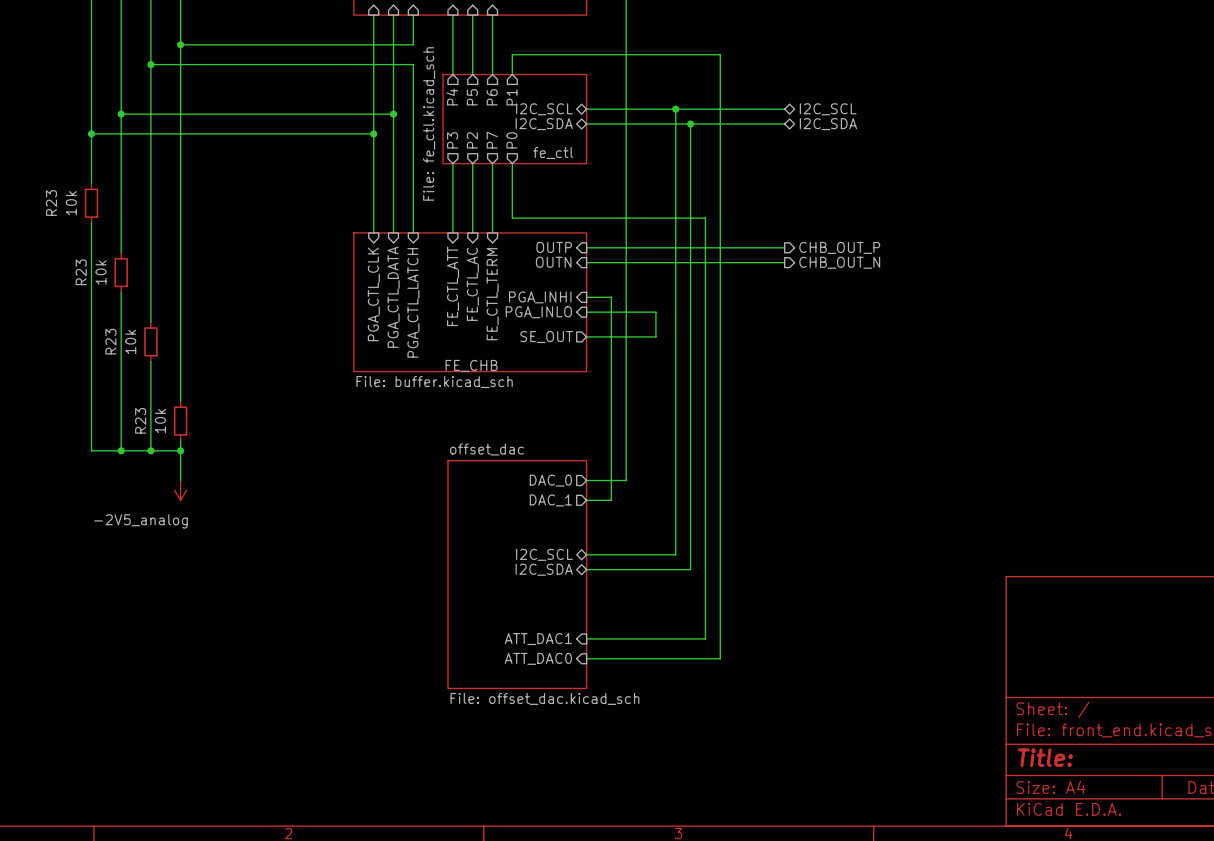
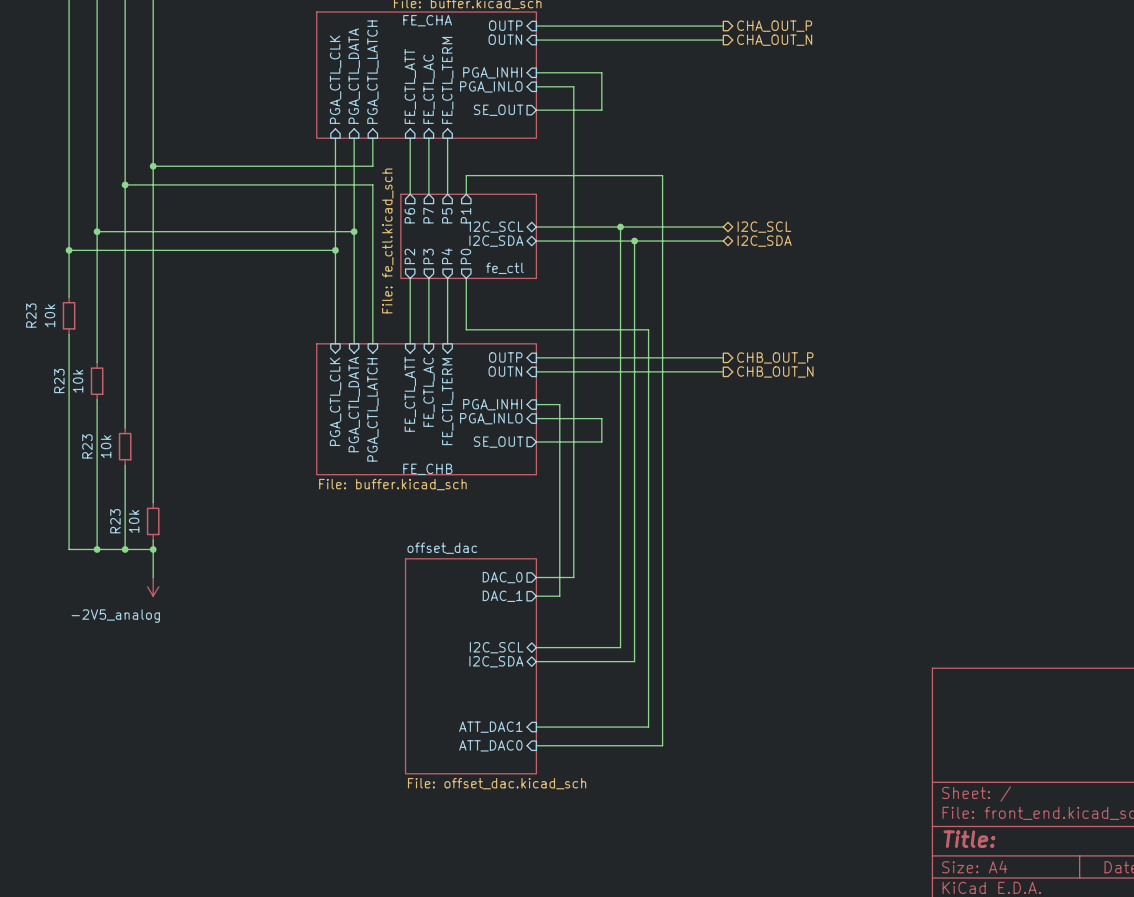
sheet pin: P4 (452, 97) -> P6 (409, 215)
sheet pin: P5 (472, 97) -> P7 (428, 215)
sheet pin: P6 (492, 97) -> P5 (447, 215)
sheet pin: P3 (452, 140) -> P2 (409, 256)
sheet pin: P2 (472, 140) -> P3 (428, 256)
sheet pin: P7 (492, 140) -> P4 (447, 256)

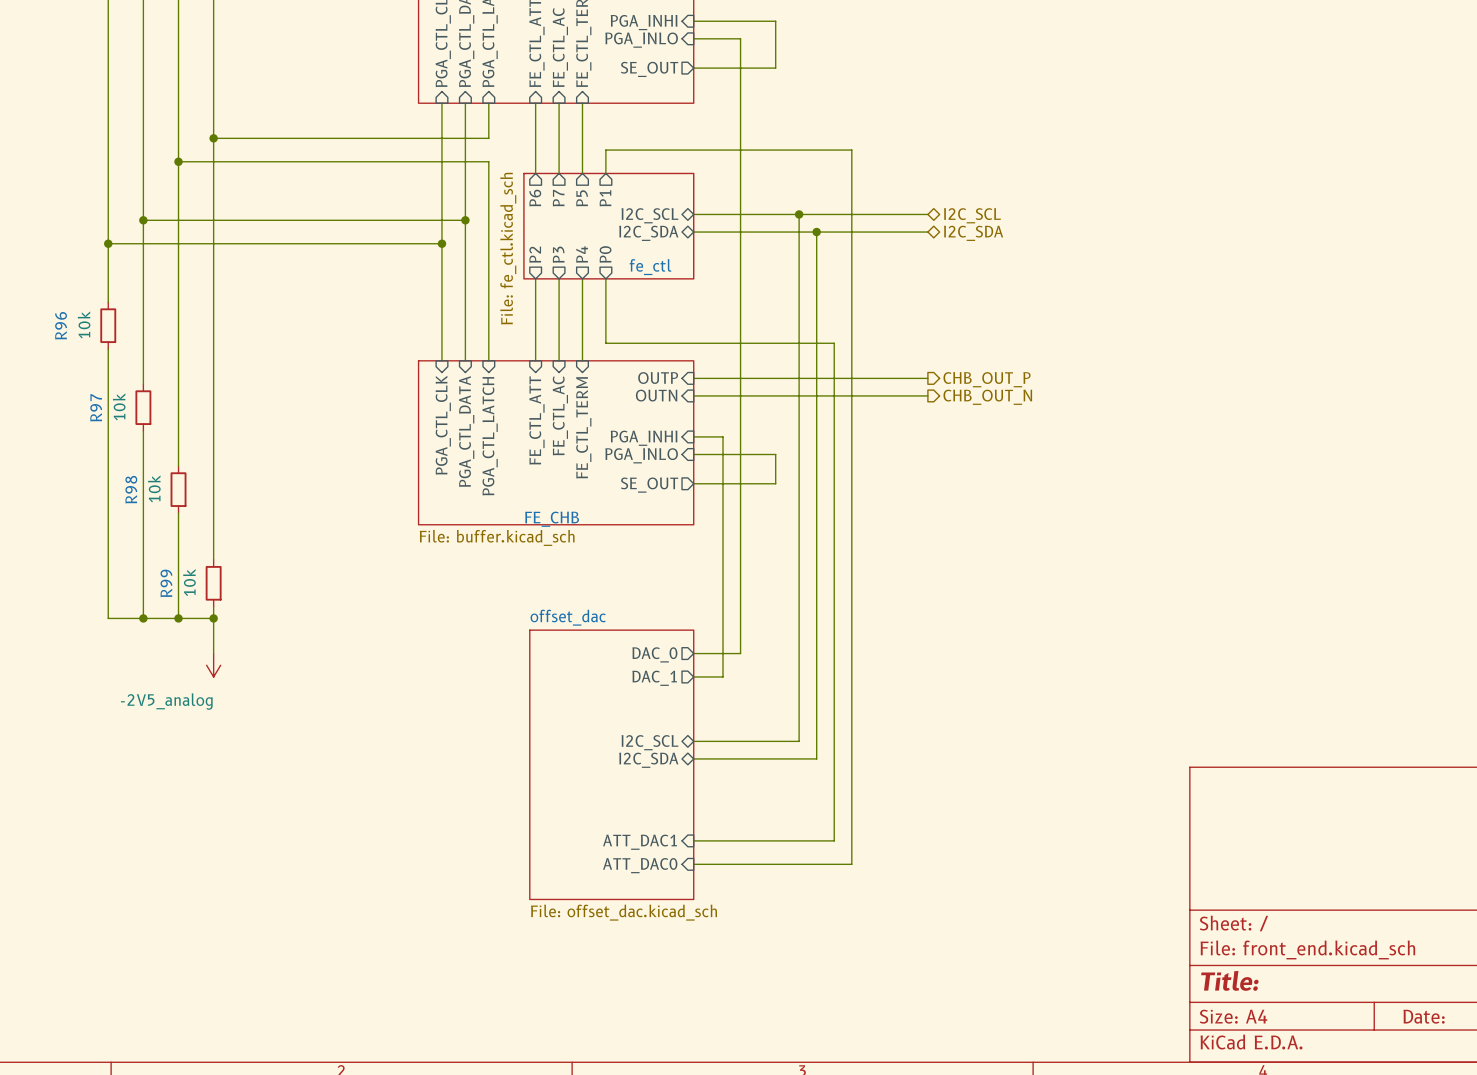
R23 name: R23 (31, 315) -> R96 (61, 325)
R23 name: R23 (59, 381) -> R97 (96, 407)
R23 name: R23 (87, 446) -> R98 (131, 489)
R23 name: R23 (115, 521) -> R99 (166, 583)

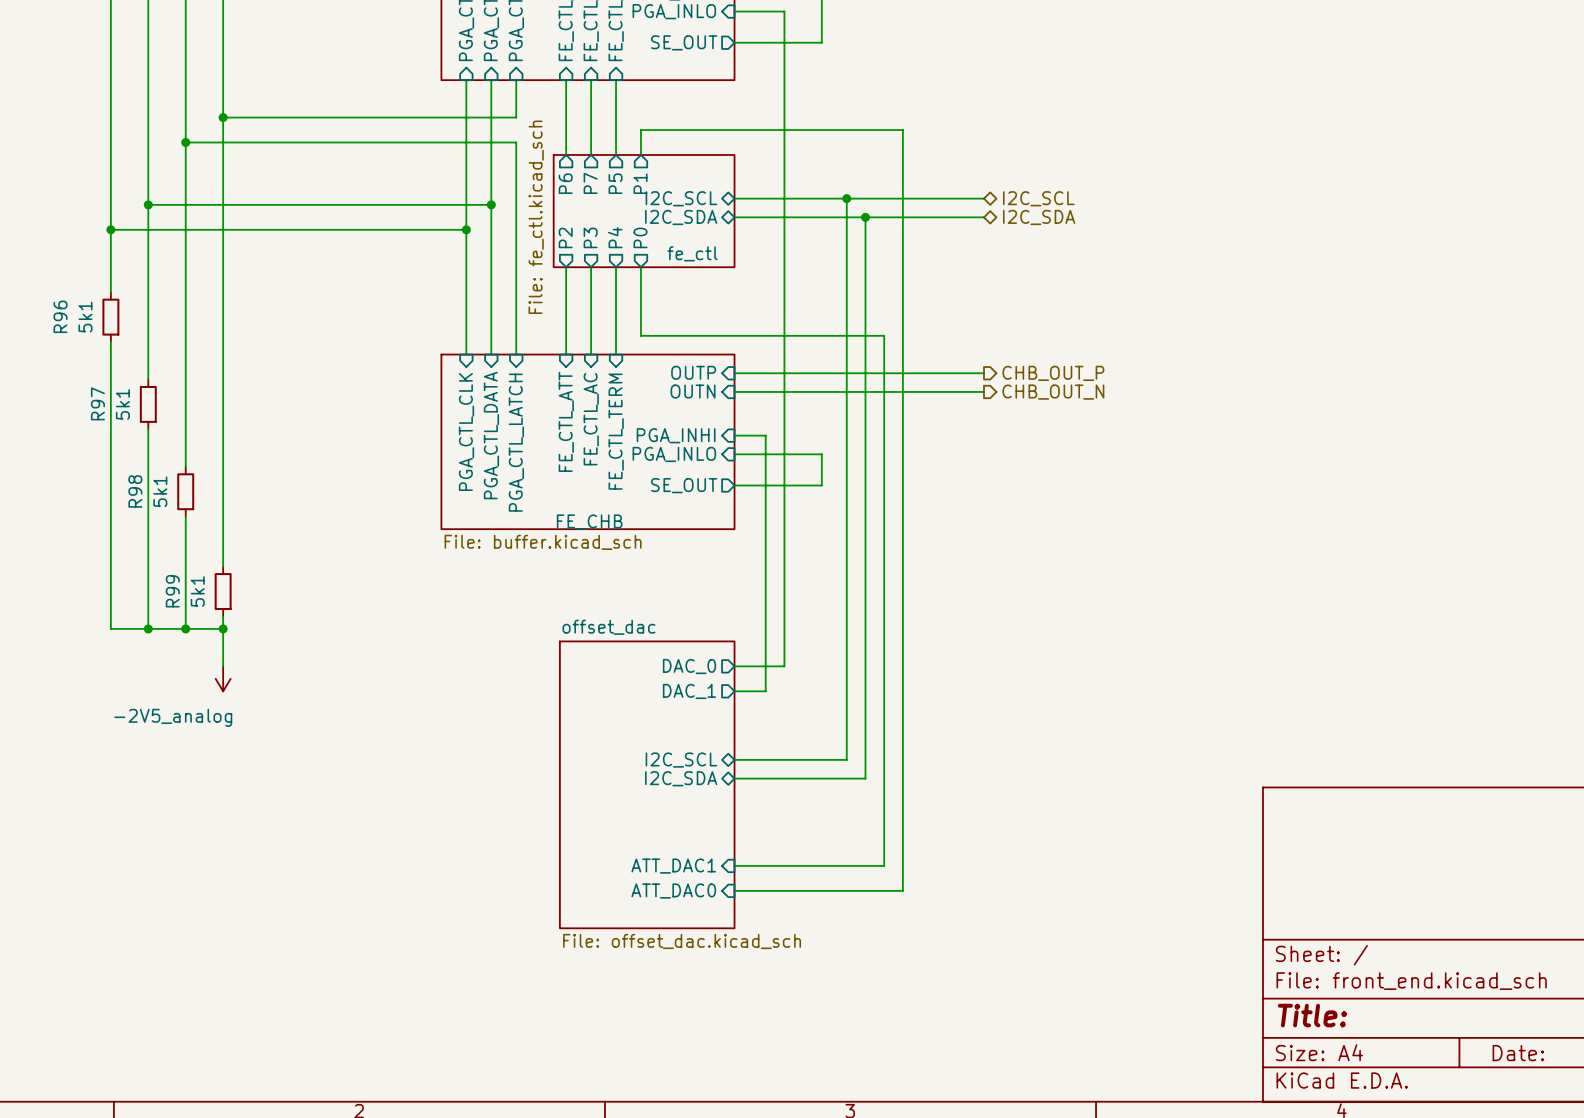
R96 value: 10k (84, 324) -> 5k1 (85, 317)
R97 value: 10k (119, 406) -> 5k1 (122, 404)
R98 value: 10k (154, 488) -> 5k1 (160, 491)
R99 value: 10k (189, 582) -> 5k1 (197, 591)

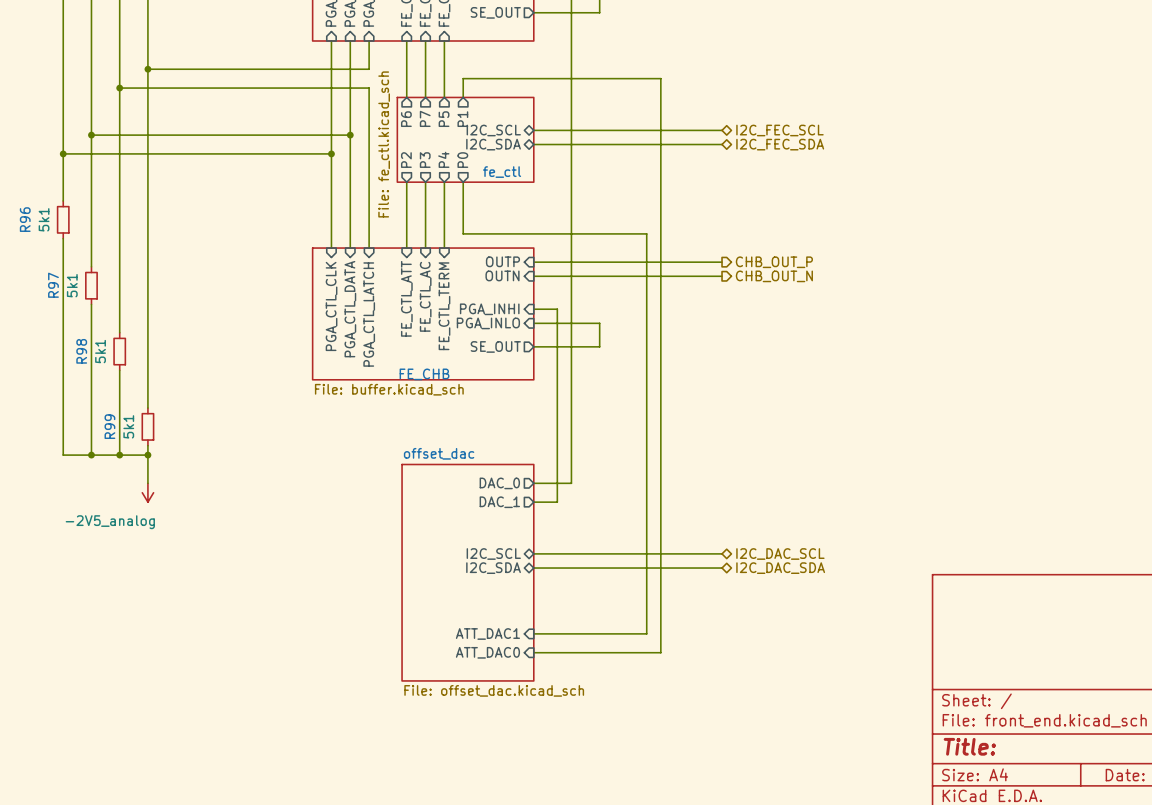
wire: (846, 198) (846, 759) -> (722, 553) (618, 553)
junction: (846, 198) -> none
hierarchical label: I2C_SCL (1038, 198) -> I2C_FEC_SCL (779, 130)
wire: (865, 217) (865, 778) -> (722, 568) (632, 568)
junction: (865, 217) -> none
hierarchical label: I2C_SDA (1039, 217) -> I2C_FEC_SDA (780, 144)
hierarchical label: none -> I2C_DAC_SCL (780, 554)
hierarchical label: none -> I2C_DAC_SDA (780, 568)

